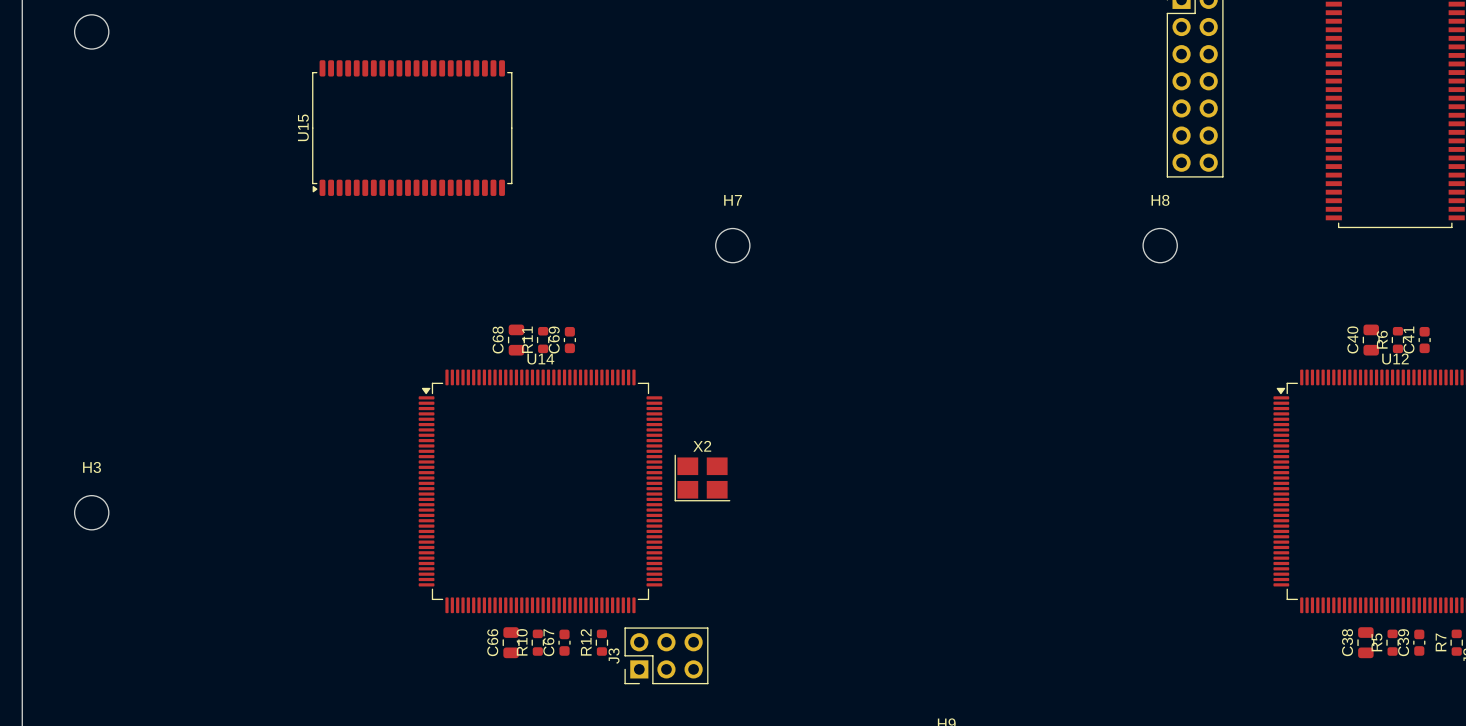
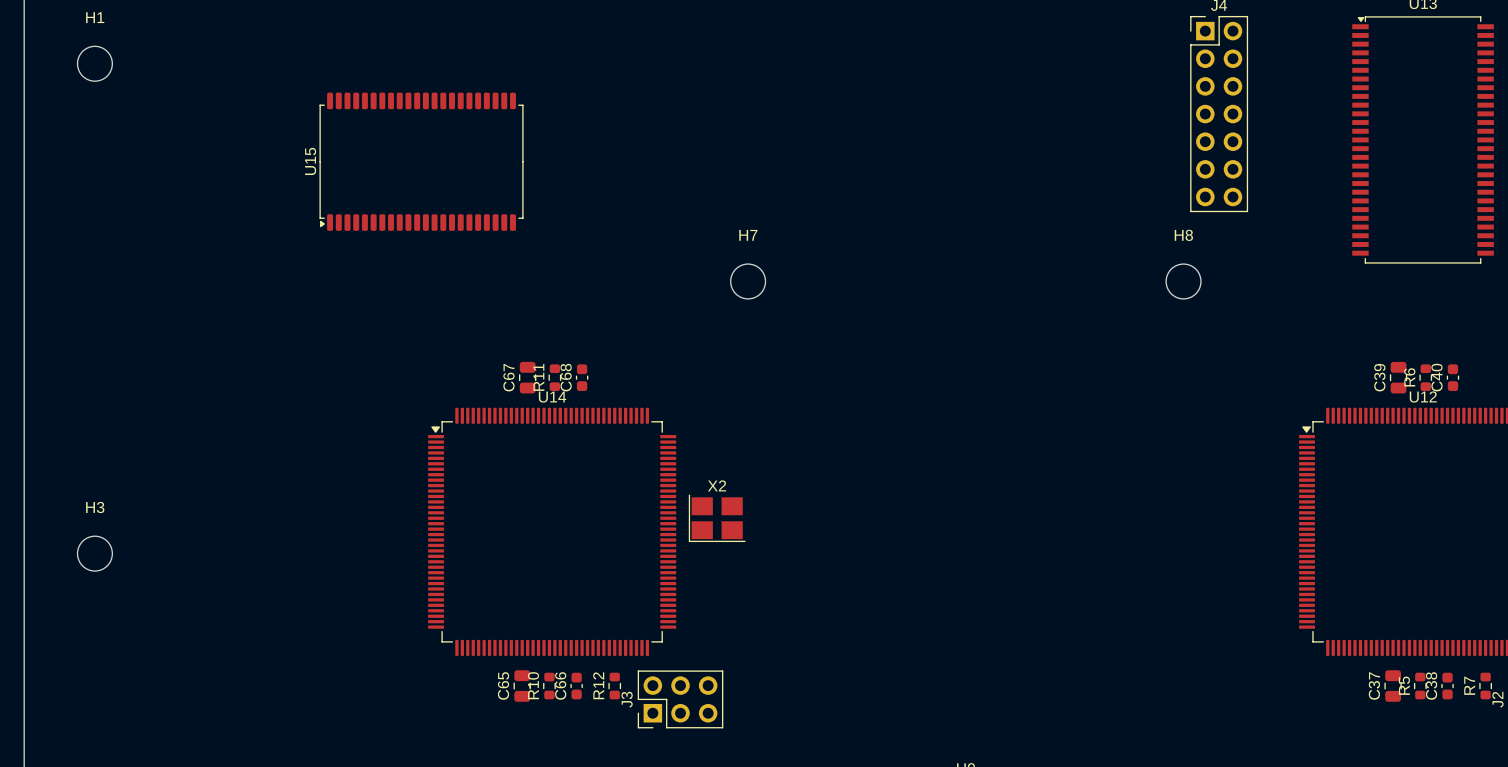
C68 name: C68 (498, 339) -> C67 (508, 377)
C40 name: C40 (1352, 339) -> C39 (1379, 377)
C69 name: C69 (554, 340) -> C68 (566, 377)
C41 name: C41 (1408, 340) -> C40 (1437, 377)
C66 name: C66 (492, 642) -> C65 (503, 685)
C67 name: C67 (548, 642) -> C66 (560, 685)
C38 name: C38 (1347, 642) -> C37 (1374, 686)
C39 name: C39 (1403, 642) -> C38 (1431, 685)

